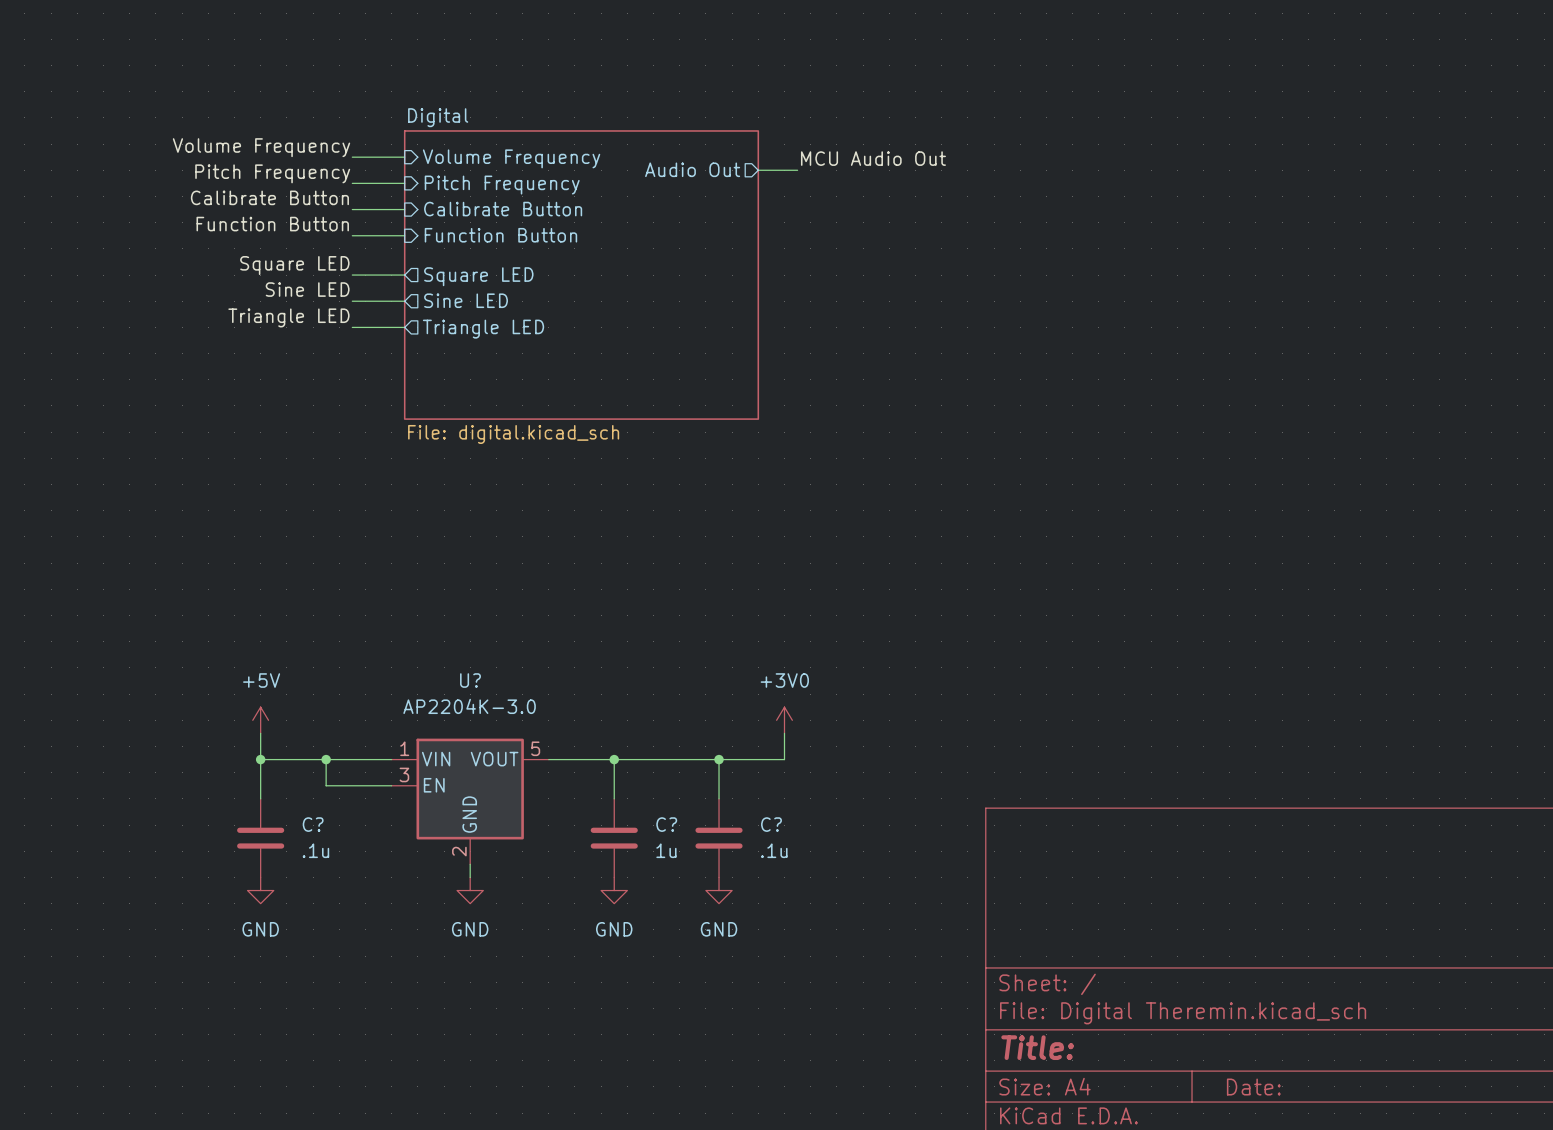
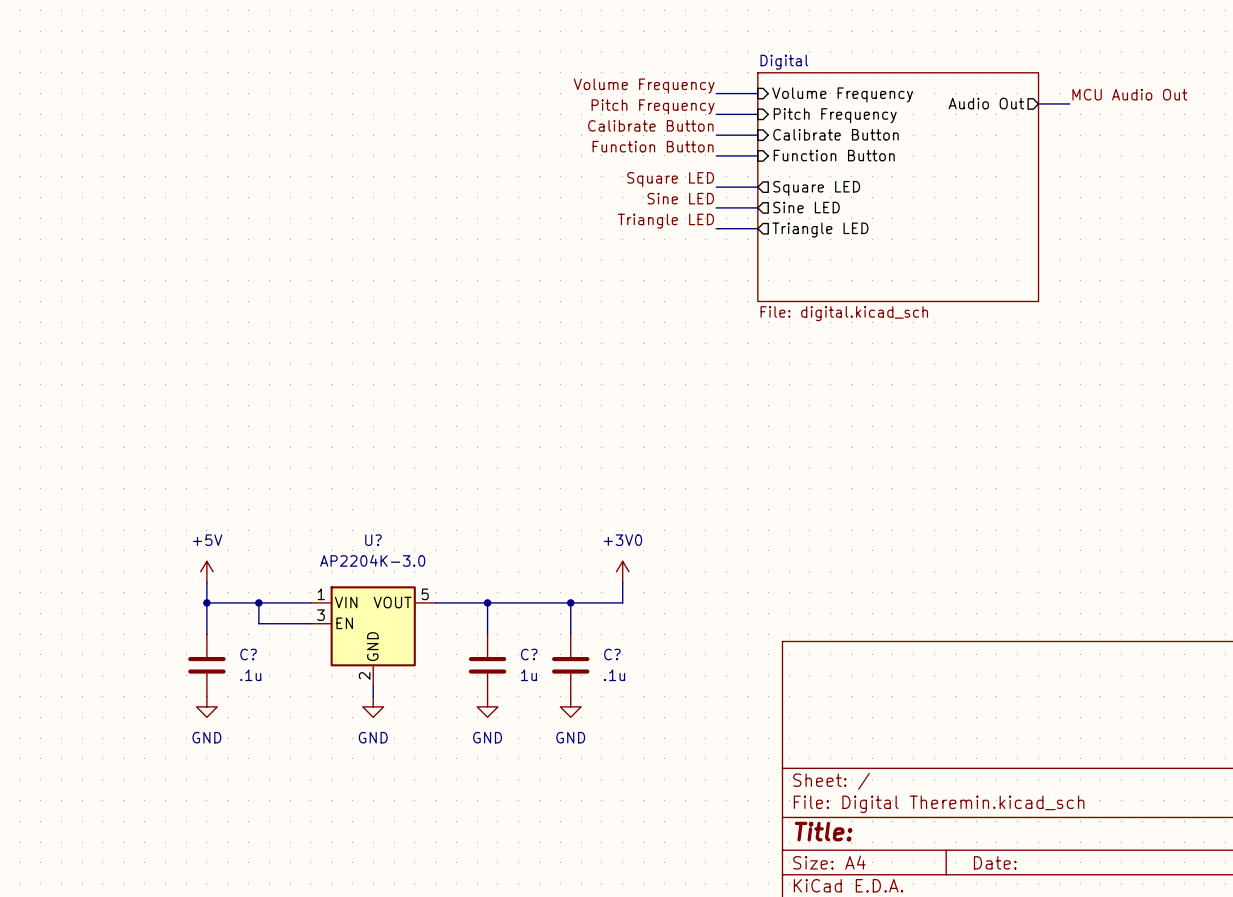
label: none -> Volume Frequency (644, 86)
wire: none -> (716, 93) (757, 93)
sheet pin: none -> Volume Frequency (842, 94)
label: none -> MCU Audio Out (1129, 94)
sheet pin: none -> Audio Out (986, 103)
wire: none -> (1038, 103) (1069, 103)
label: none -> Pitch Frequency (653, 106)
wire: none -> (716, 114) (757, 114)
sheet pin: none -> Pitch Frequency (835, 115)
label: Volume Frequency (261, 147) -> none
wire: (352, 157) (404, 157) -> none
sheet pin: Volume Frequency (511, 158) -> none
label: none -> Calibrate Button (650, 125)
label: MCU Audio Out (873, 158) -> none
sheet pin: Audio Out (692, 169) -> none
sheet pin: none -> Calibrate Button (835, 134)
wire: (758, 170) (797, 170) -> none
wire: none -> (716, 135) (757, 135)
label: Pitch Frequency (272, 173) -> none
wire: (352, 183) (404, 183) -> none
label: none -> Function Button (653, 146)
sheet pin: Pitch Frequency (502, 185) -> none
sheet pin: none -> Function Button (834, 155)
wire: none -> (716, 155) (757, 155)
label: Calibrate Button (269, 197) -> none
wire: (352, 209) (404, 209) -> none
sheet pin: Calibrate Button (503, 209) -> none
label: Function Button (272, 224) -> none
label: none -> Square LED (670, 179)
wire: (352, 235) (404, 235) -> none
sheet pin: Function Button (500, 235) -> none
wire: none -> (716, 187) (757, 187)
sheet Digital: none -> File: digital.kicad_sch (898, 187)
sheet pin: none -> Square LED (816, 188)
label: none -> Sine LED (680, 198)
wire: none -> (716, 207) (757, 207)
sheet pin: none -> Sine LED (806, 207)
label: Square LED (294, 265) -> none
wire: (352, 275) (404, 275) -> none
sheet Digital: File: digital.kicad_sch (581, 275) -> none
sheet pin: Square LED (478, 276) -> none
label: none -> Triangle LED (665, 221)
wire: none -> (716, 228) (757, 228)
label: Sine LED (307, 289) -> none
sheet pin: none -> Triangle LED (820, 230)
sheet pin: Sine LED (466, 300) -> none
wire: (352, 301) (404, 301) -> none
label: Triangle LED (288, 317) -> none
wire: (352, 327) (404, 327) -> none
sheet pin: Triangle LED (483, 329) -> none

